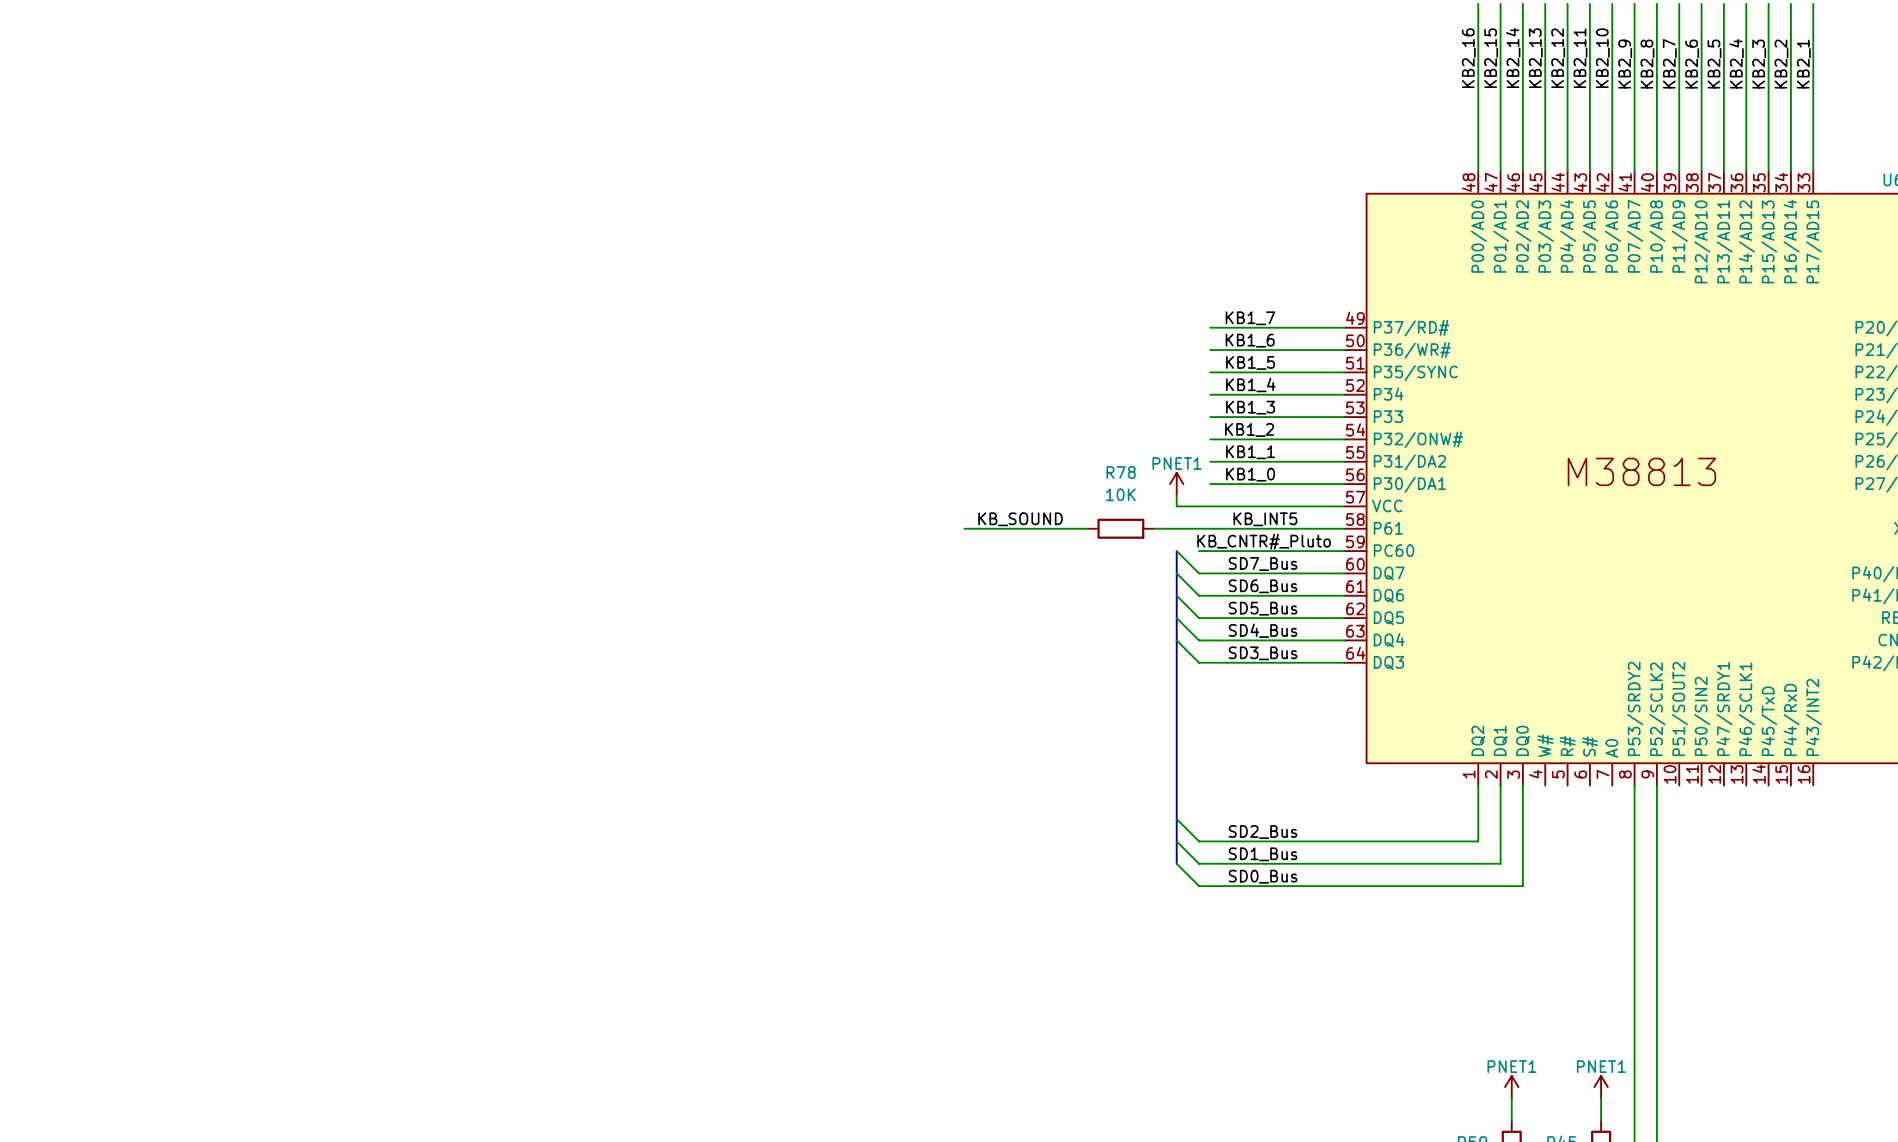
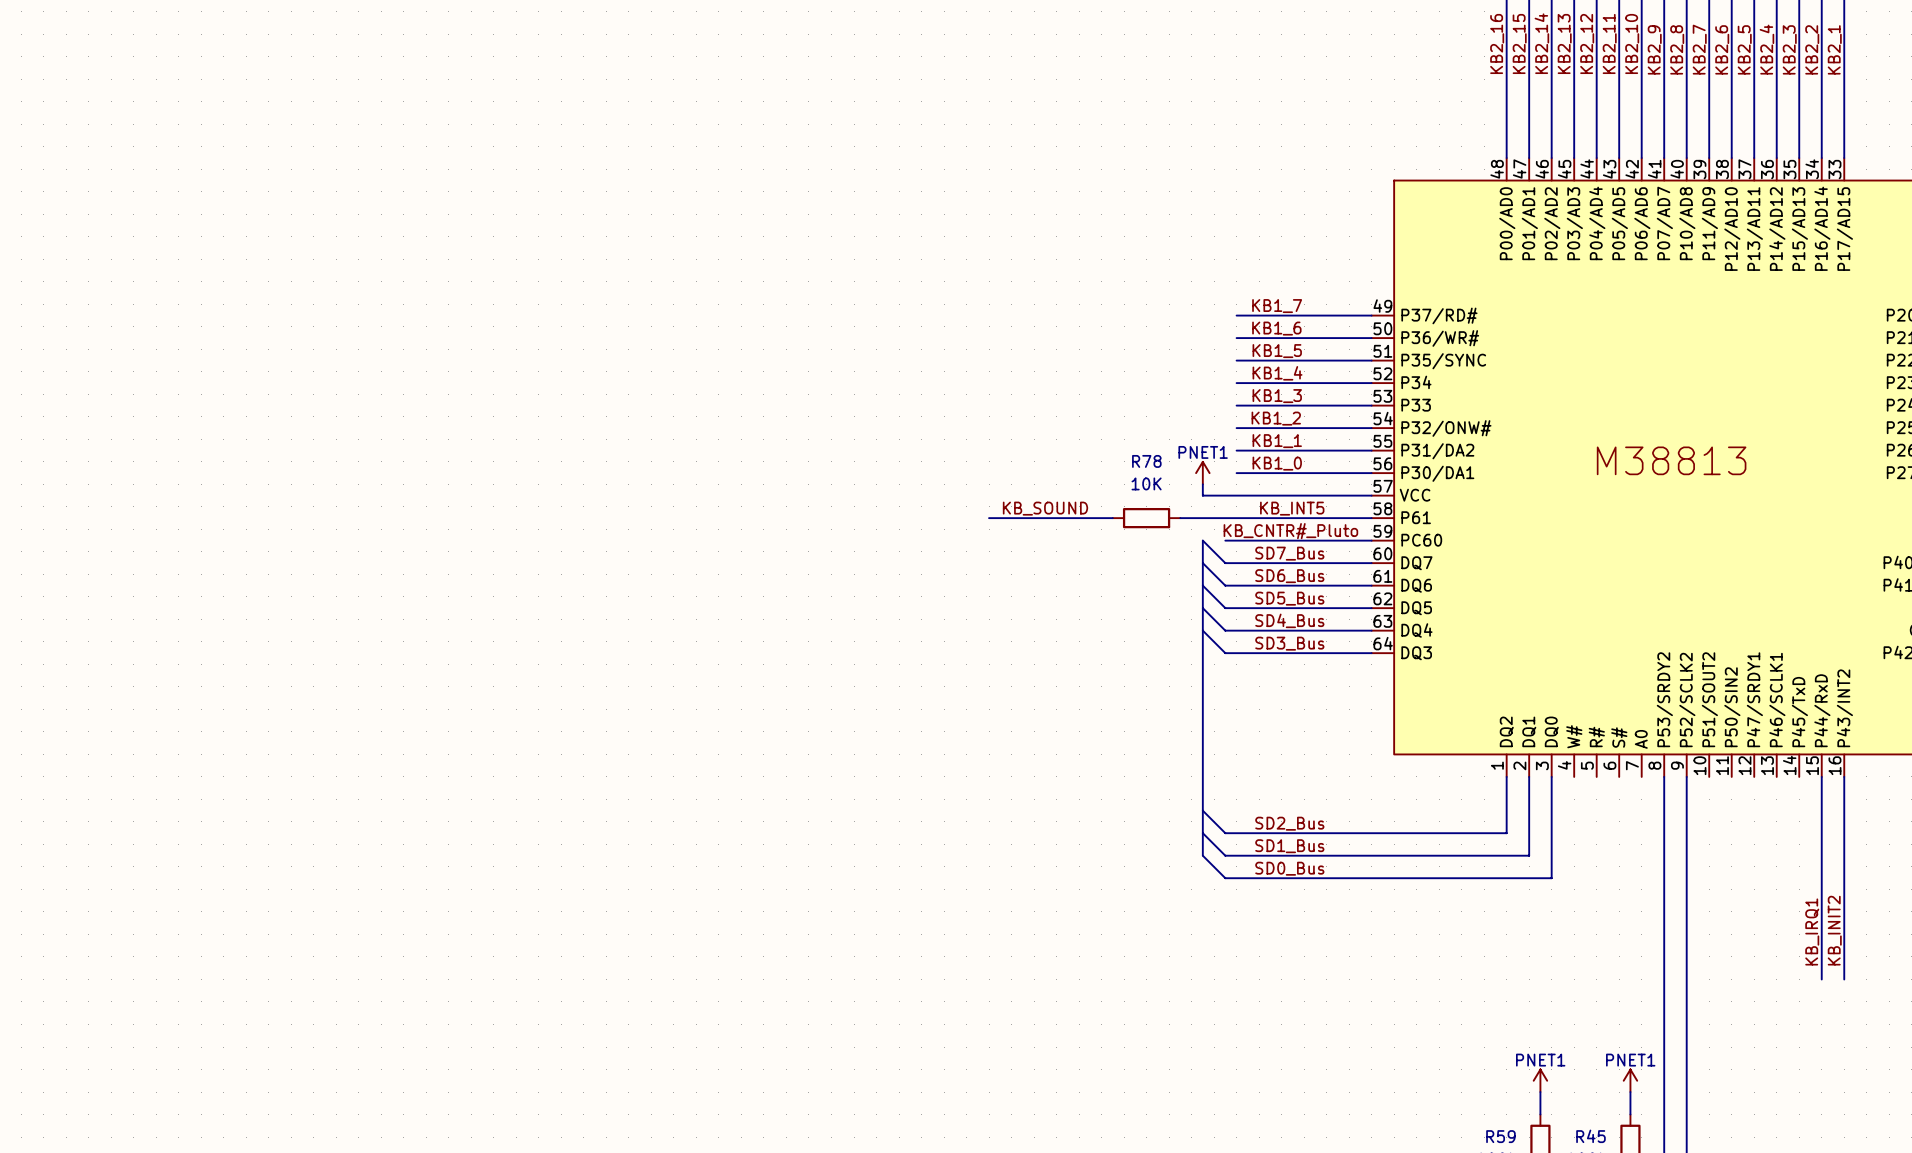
wire: none -> (1821, 776) (1821, 979)
wire: none -> (1844, 776) (1844, 979)
label: none -> KB_INIT2 (1834, 930)
label: none -> KB_IRQ1 (1812, 931)

